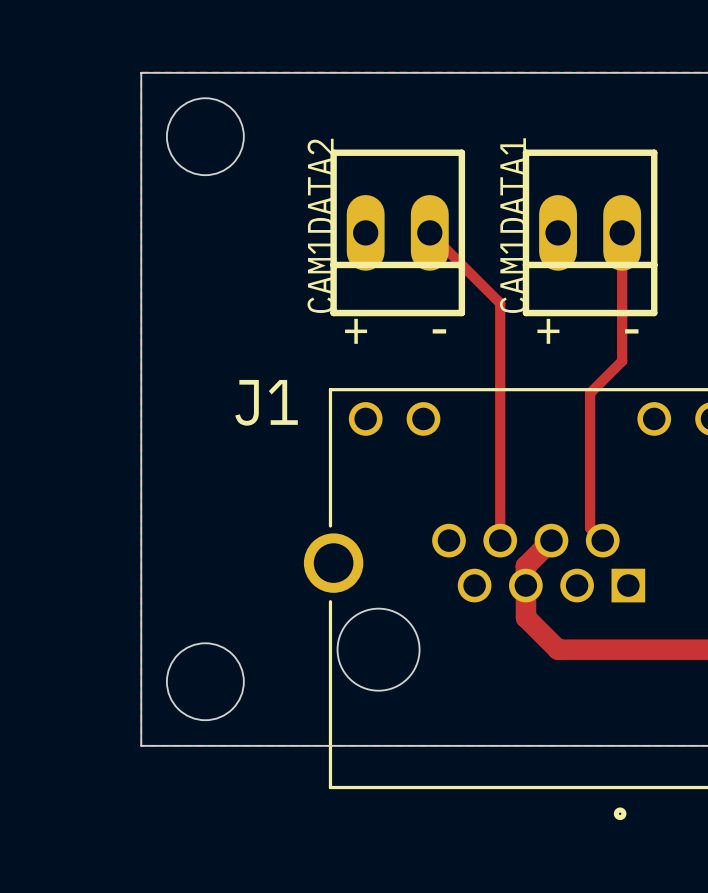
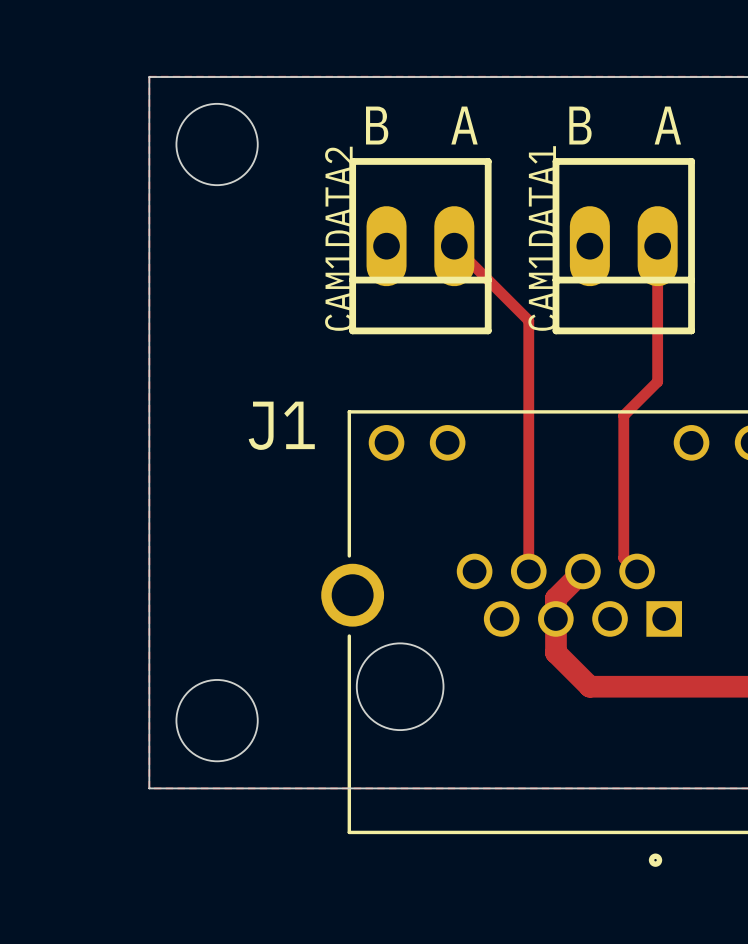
text: none -> B A (421, 125)
text: none -> B A (625, 125)
text: + - (395, 331) -> none
text: + - (587, 331) -> none

